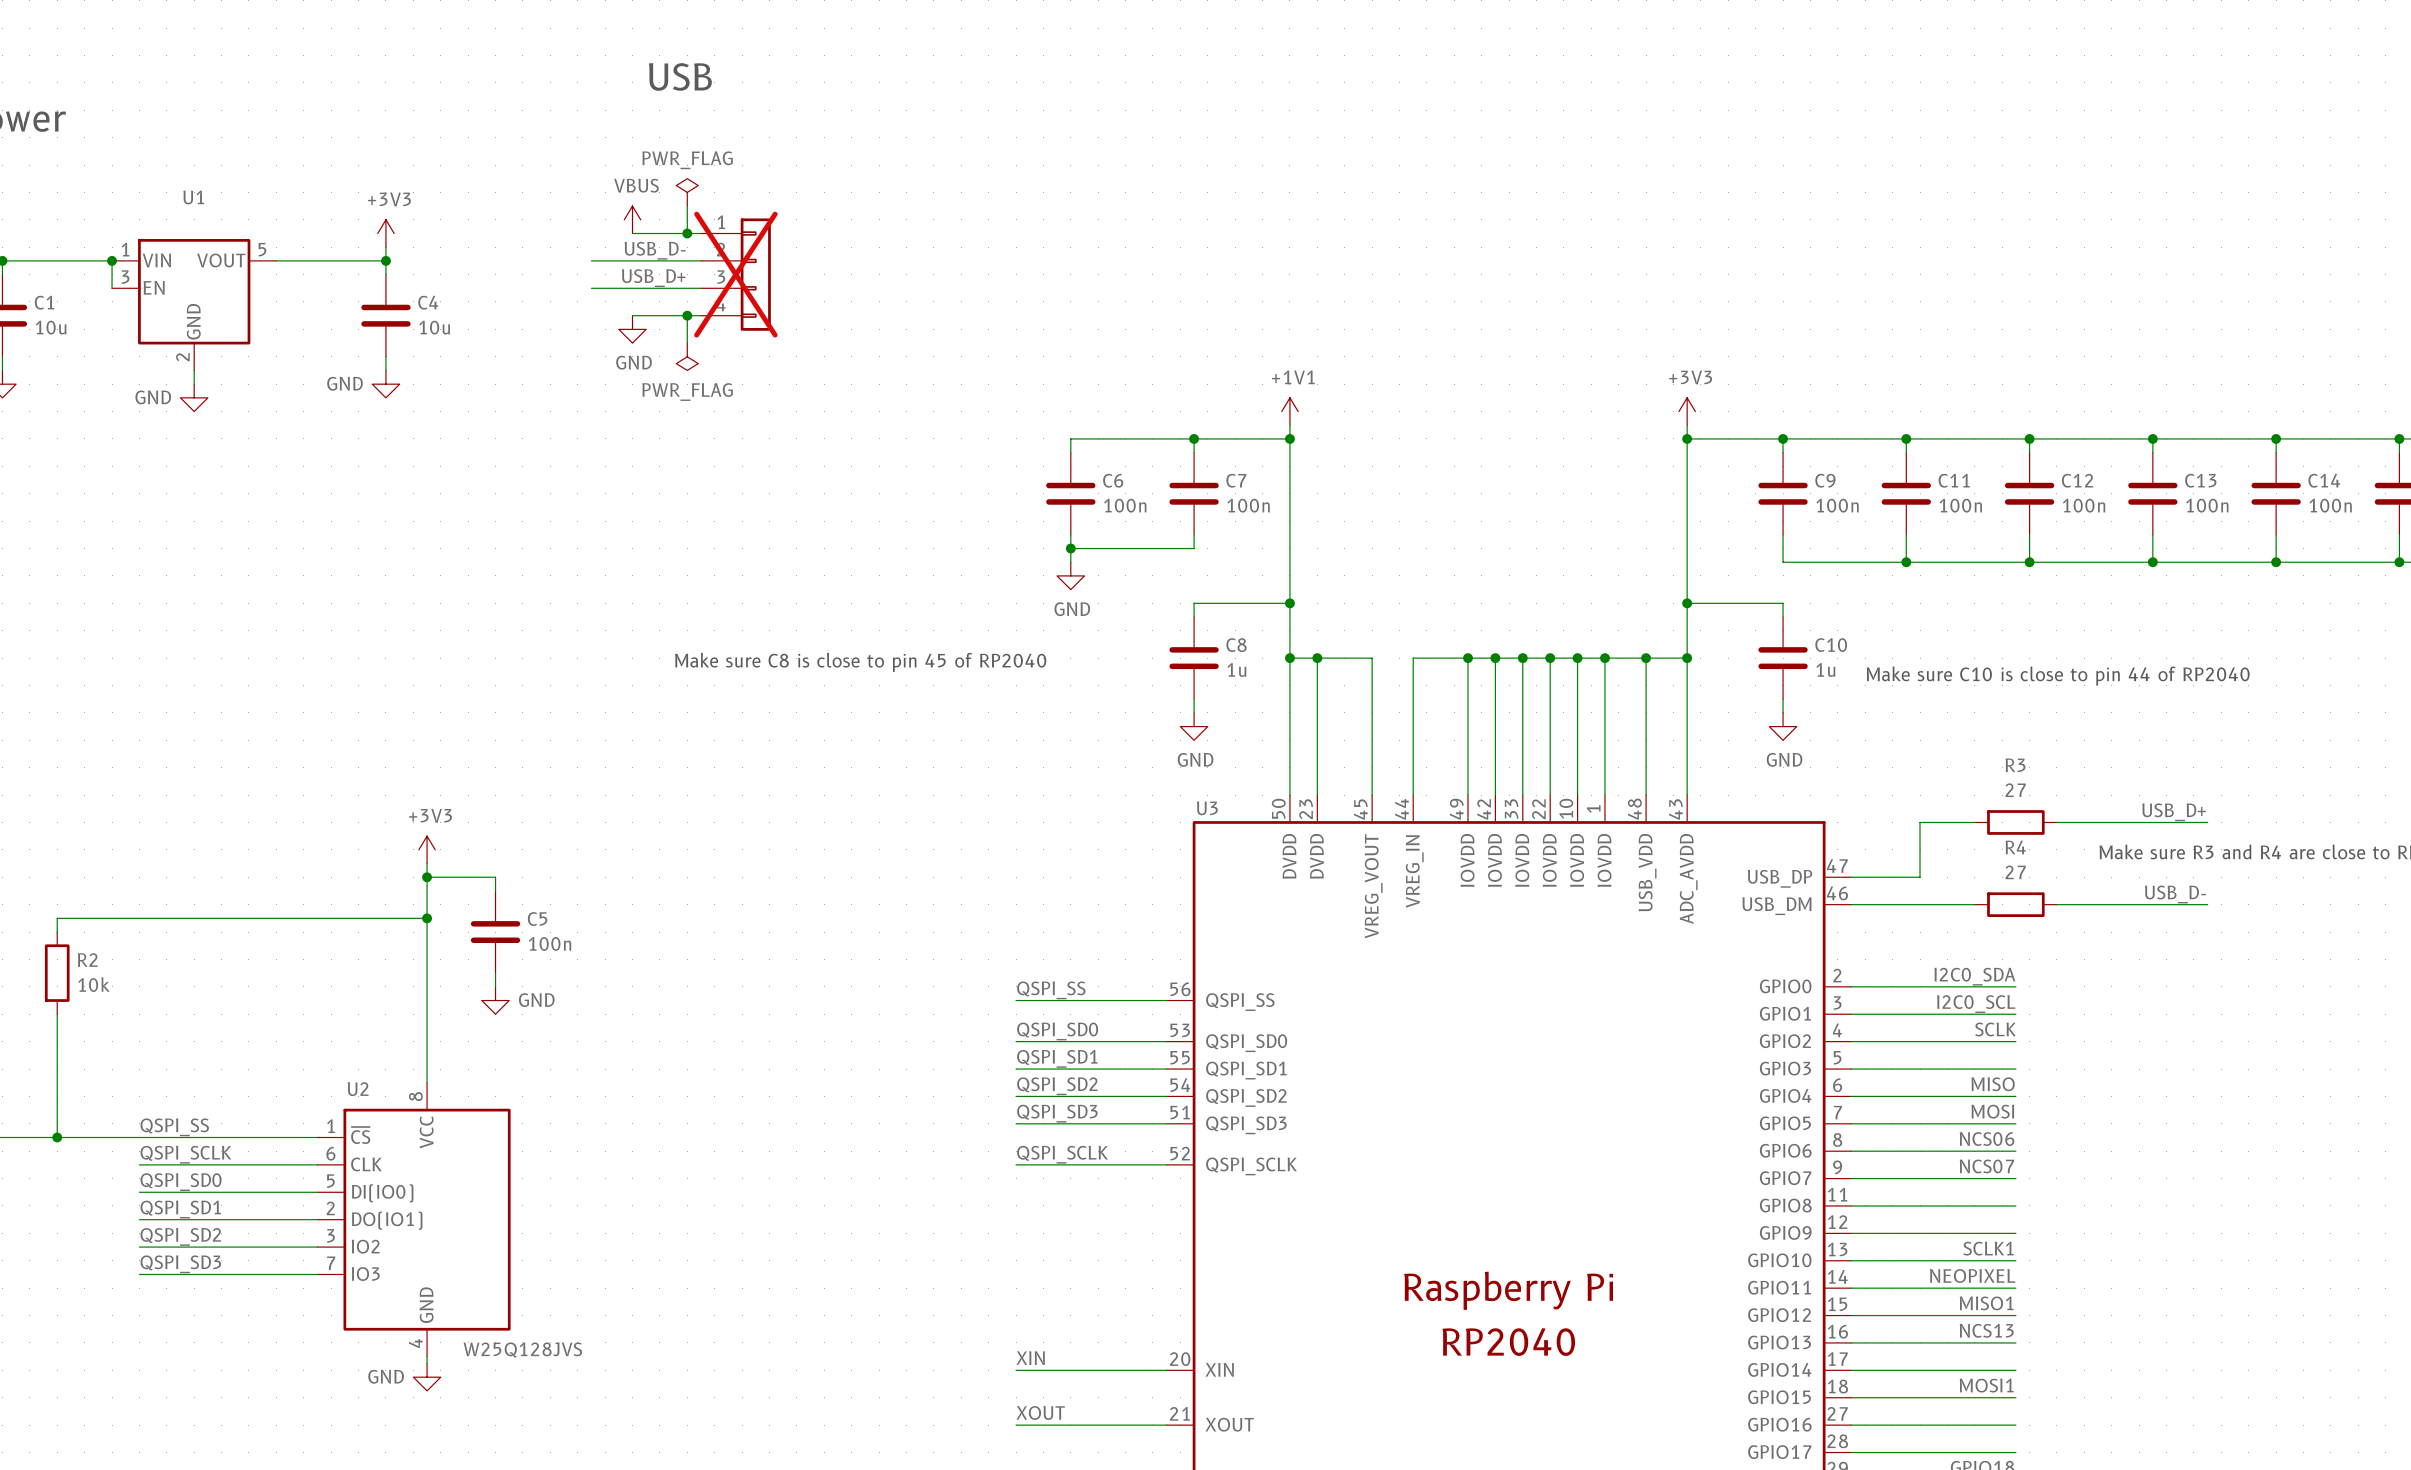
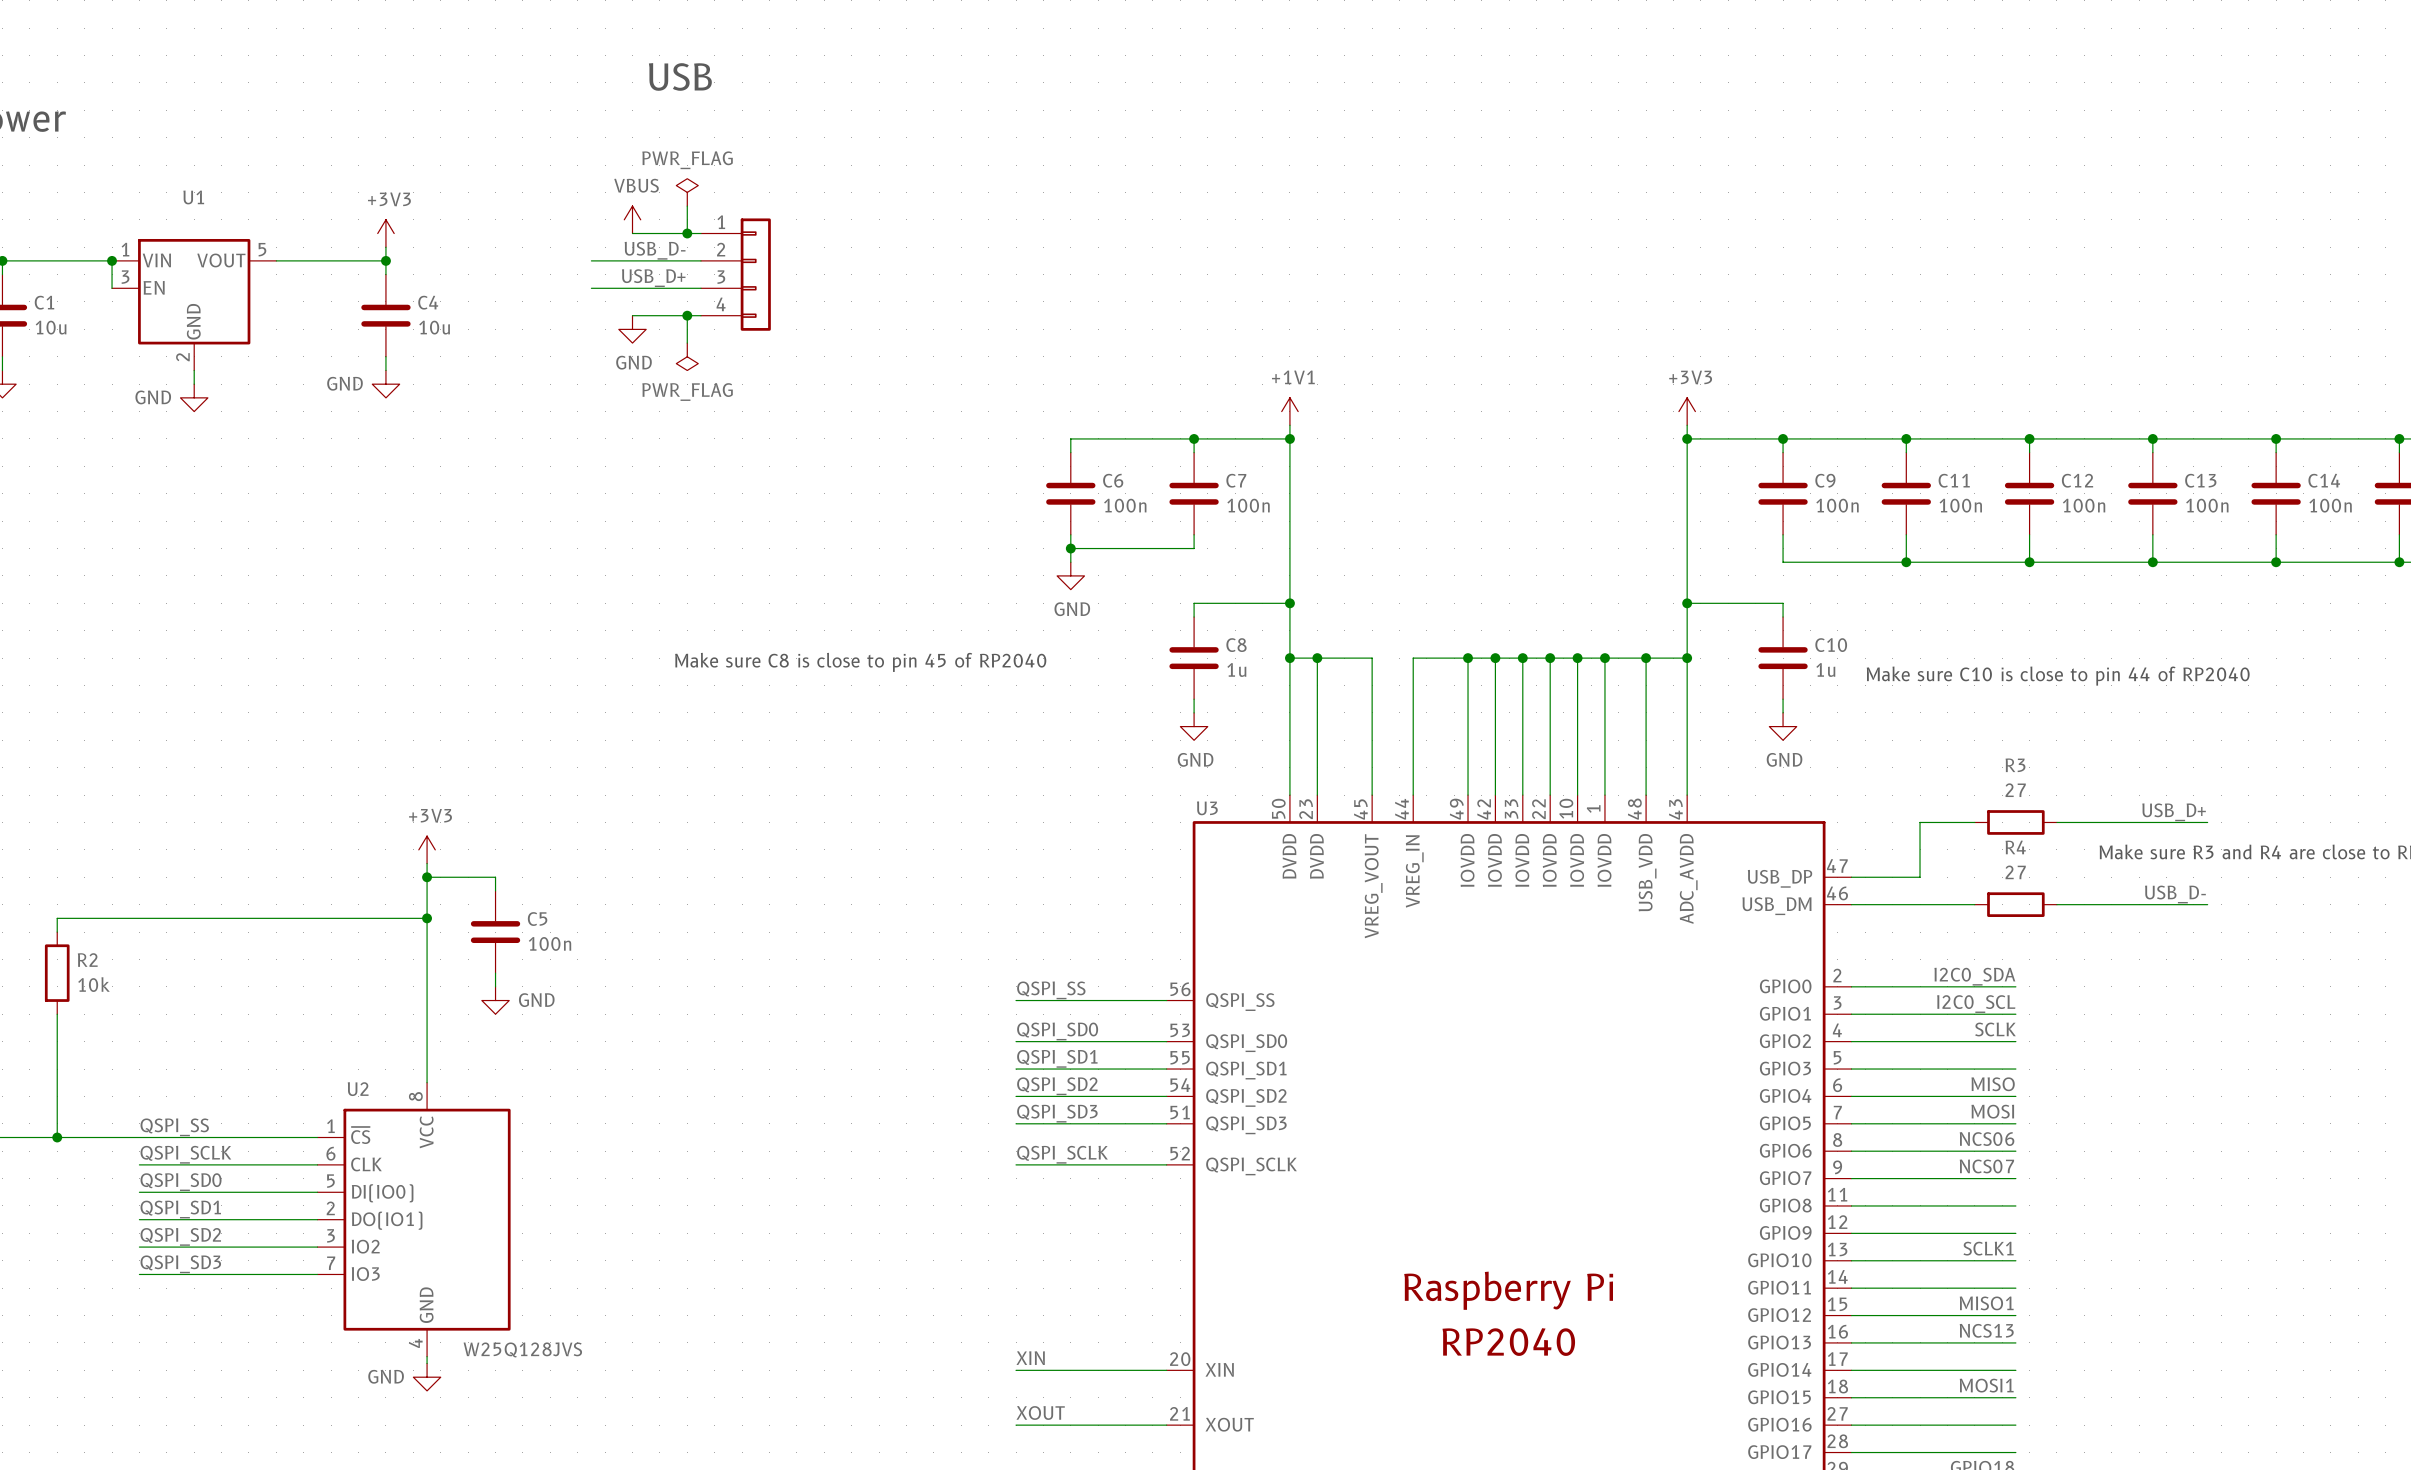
part do-not-place cross: (735, 274) -> none
label: NEOPIXEL (1972, 1276) -> none

